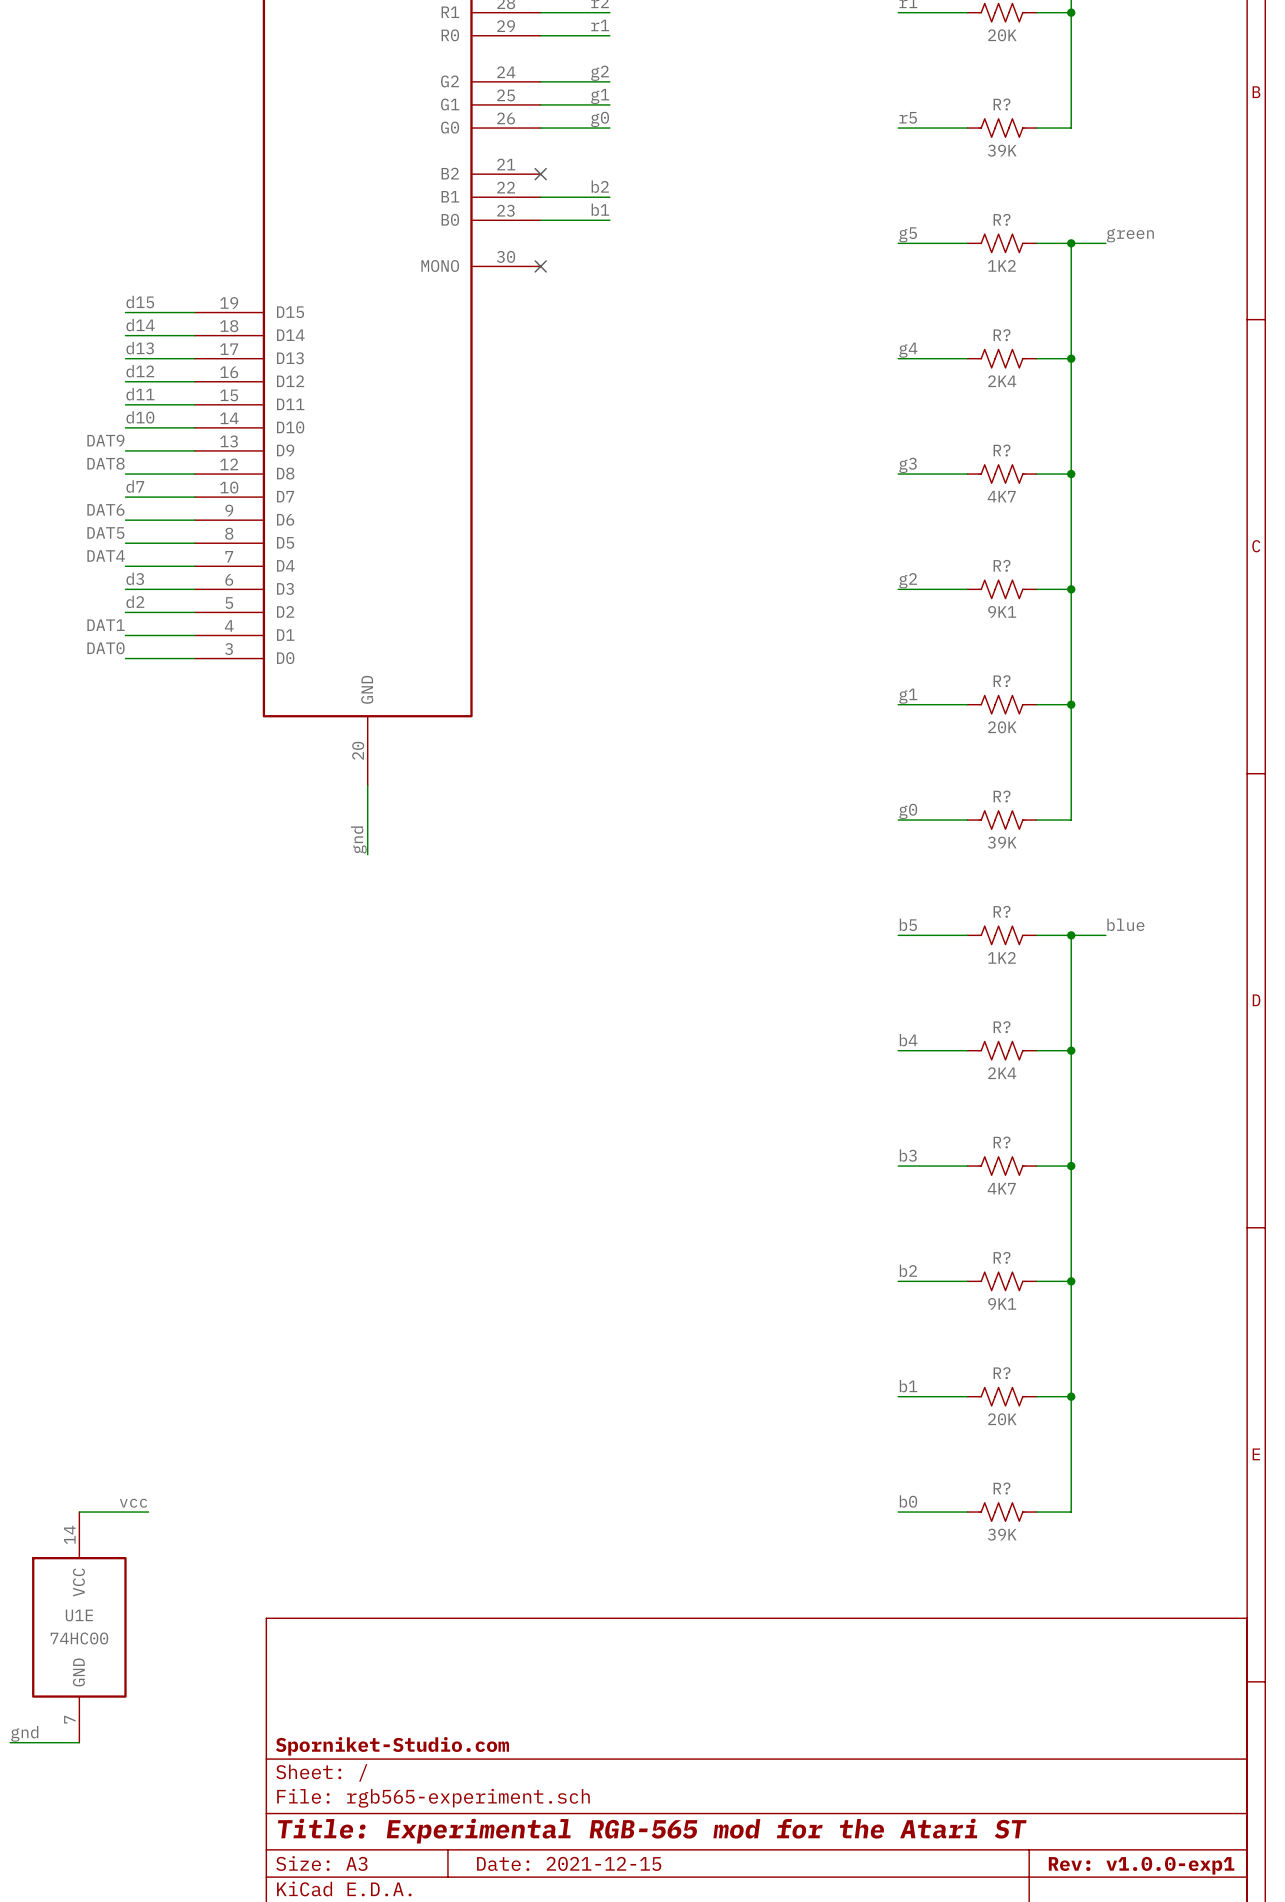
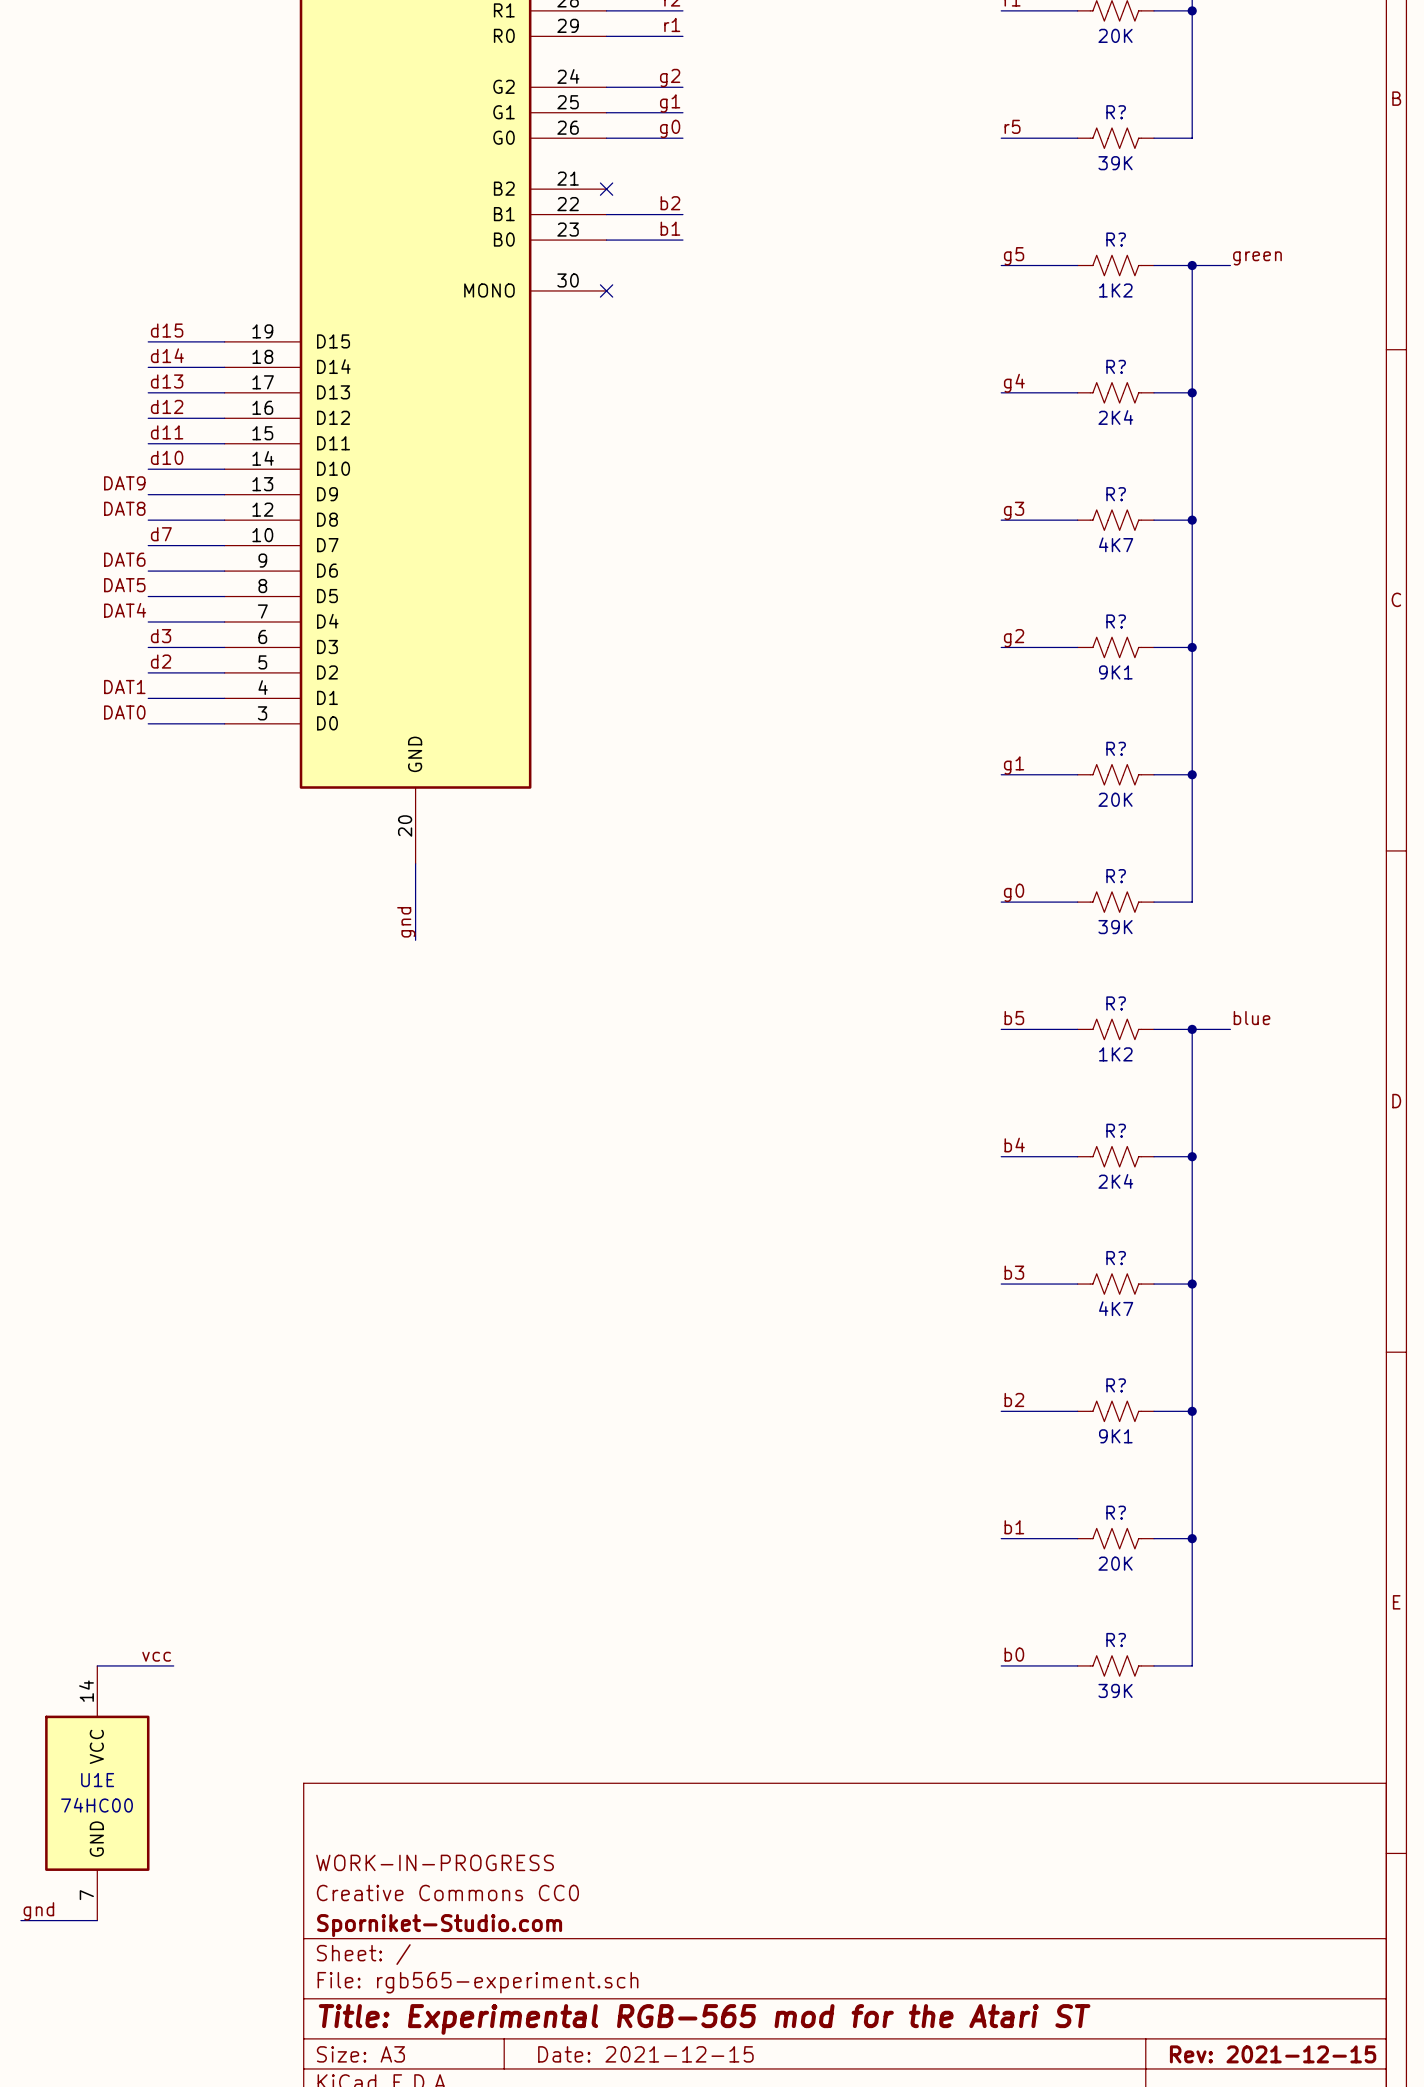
title block: none -> WORK-IN-PROGRESS (435, 1862)
title block: none -> Creative Commons CC0 (447, 1892)
title block: Rev: v1.0.0-exp1 (1141, 1865) -> Rev: 2021-12-15 (1273, 2054)

